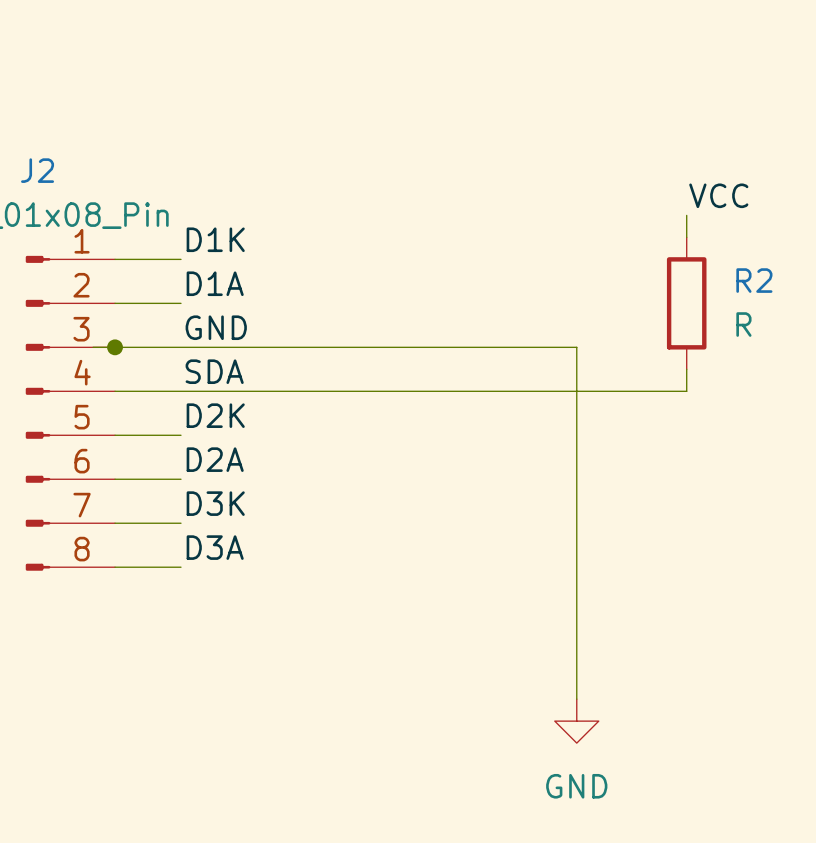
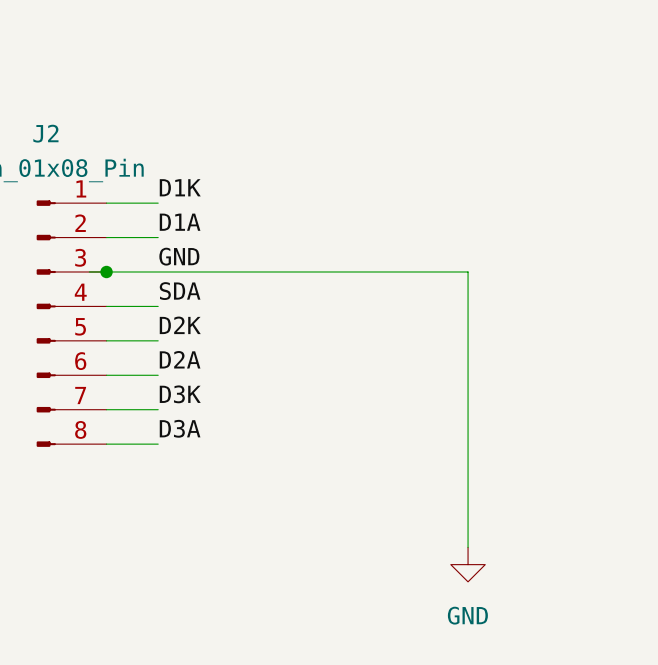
label: VCC (718, 195) -> none
wire: (686, 215) (686, 237) -> none
R2: R (686, 303) -> none
wire: (686, 369) (686, 391) (180, 391) -> none

